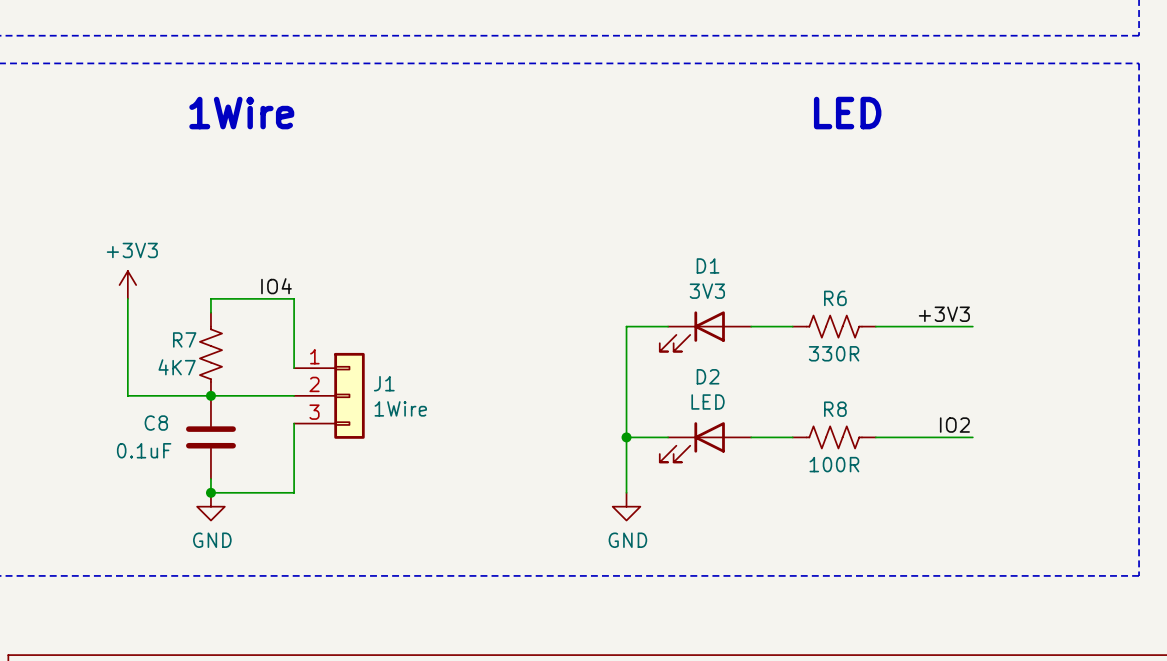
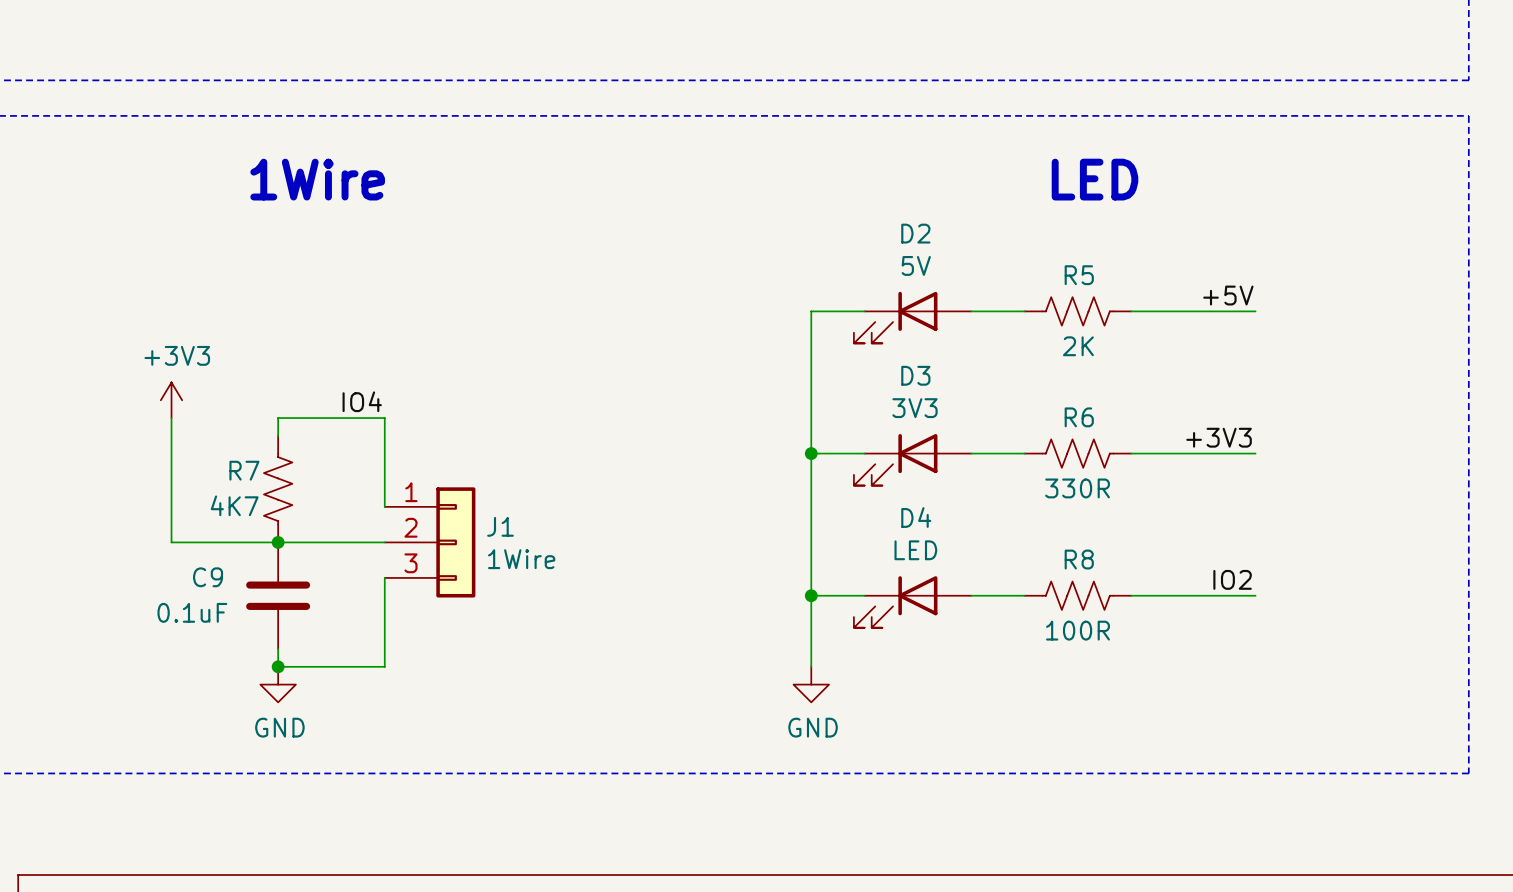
label: none -> +5V (1228, 295)
wire: none -> (864, 311) (811, 311) (811, 453)
wire: none -> (971, 311) (1024, 311)
R5: none -> 2K (1077, 311)
wire: none -> (1131, 311) (1255, 311)
D2: none -> 5V (912, 317)
D1 name: D1 (708, 265) -> D3 (915, 375)
junction: none -> (811, 453)
D2 name: D2 (708, 376) -> D4 (916, 517)
C8 name: C8 (156, 423) -> C9 (208, 577)

